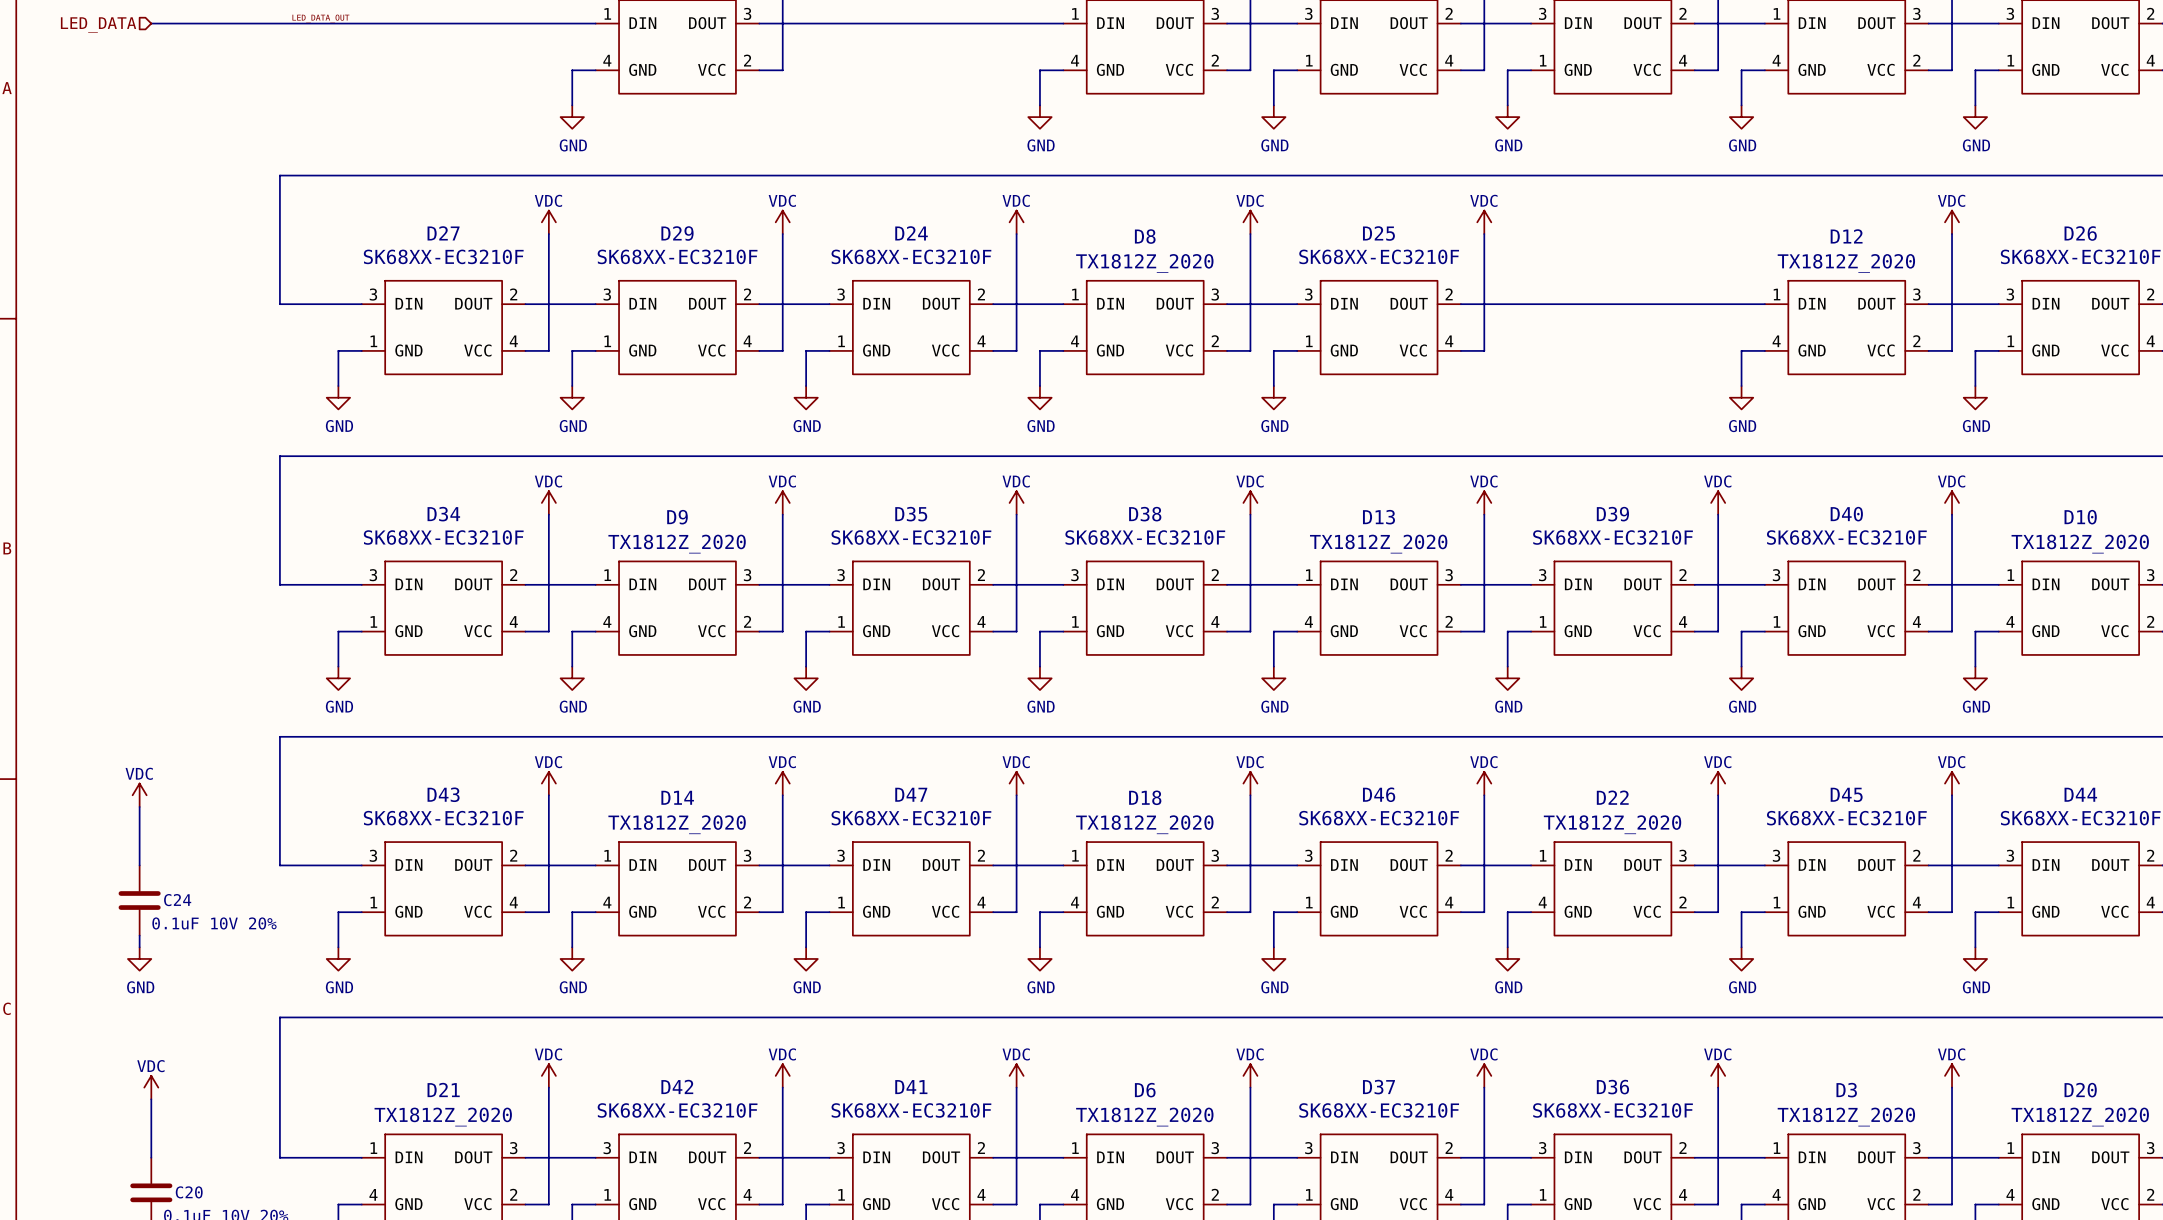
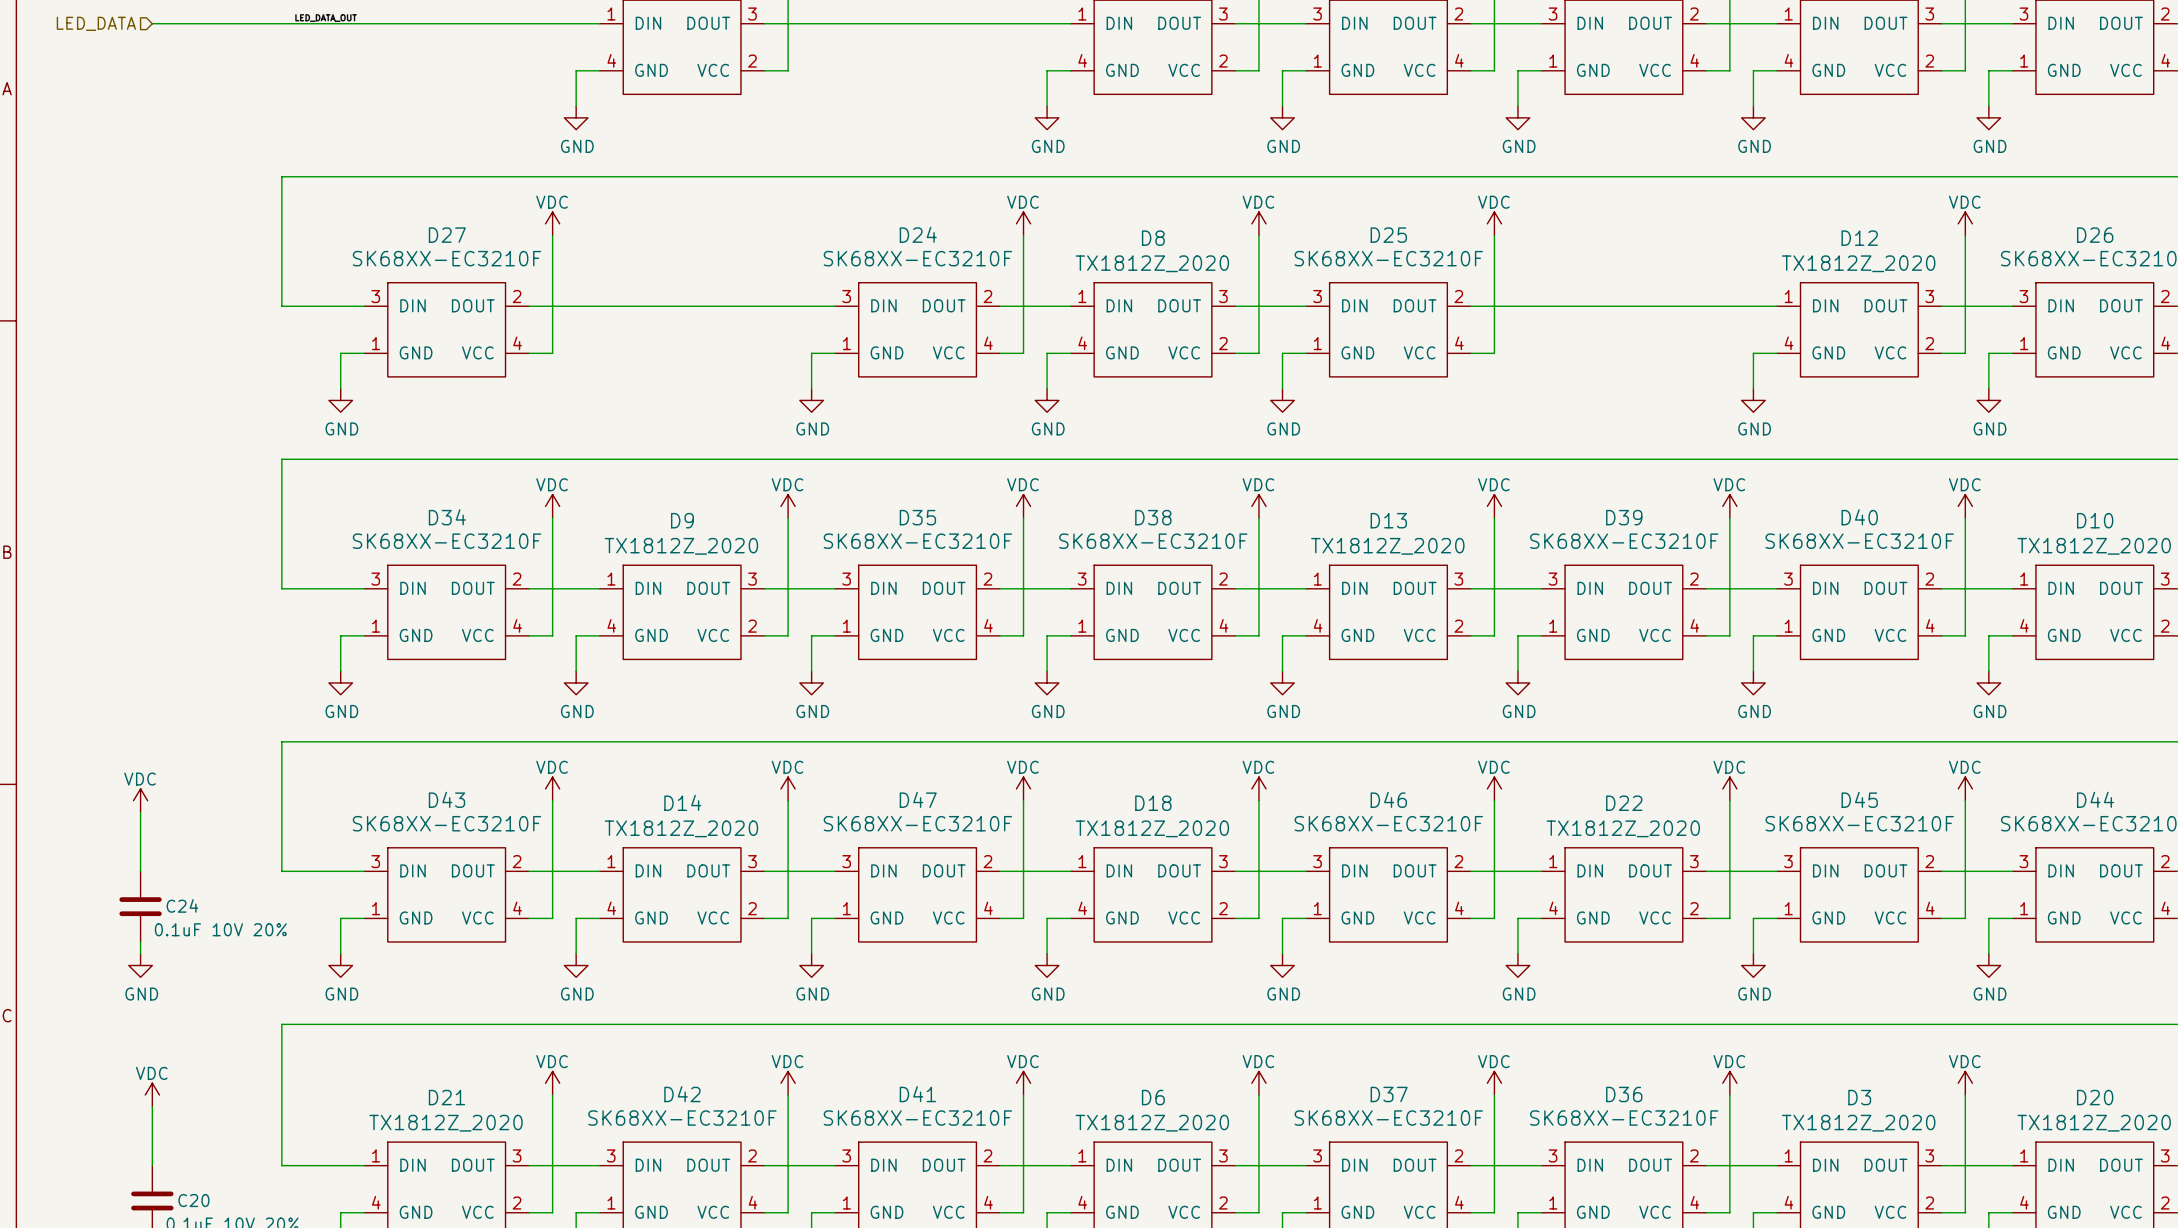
power symbol: VDC (782, 222) -> none
wire: (782, 234) (782, 350) (759, 350) -> none
wire: none -> (599, 306) (764, 306)
D29: SK68XX-EC3210F (677, 327) -> none
wire: (595, 350) (572, 350) (572, 386) -> none
power symbol: GND (572, 397) -> none

